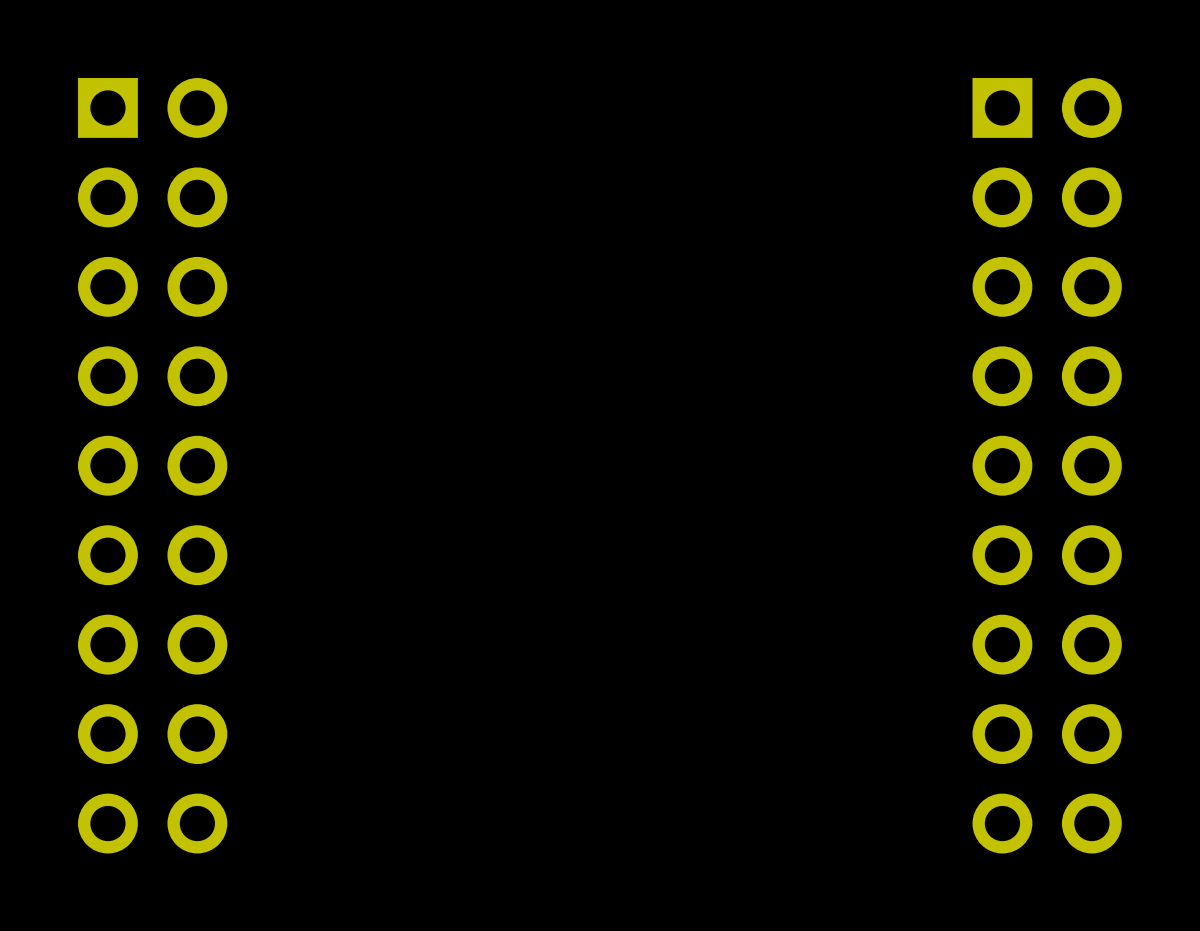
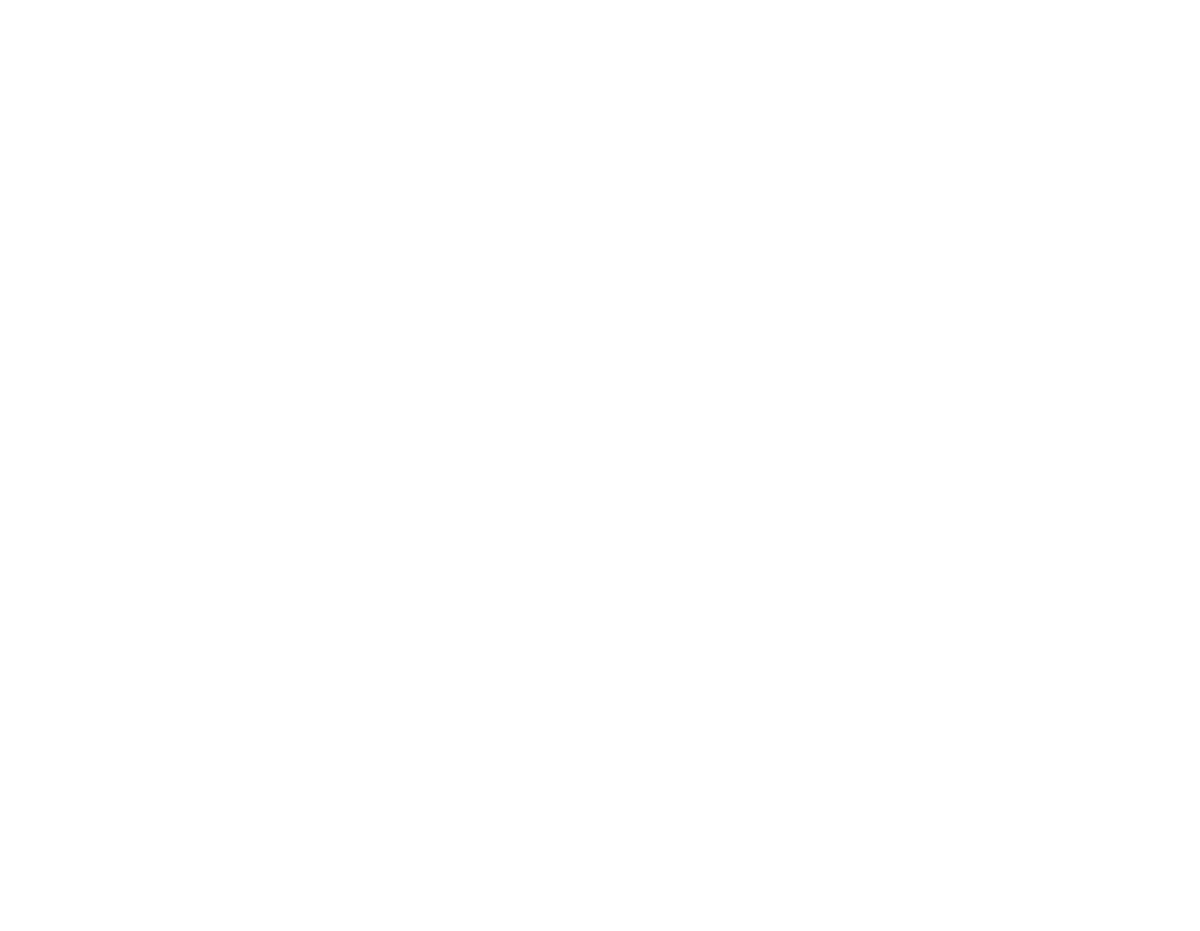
part: (152, 465) -> none
part: (1047, 465) -> none

